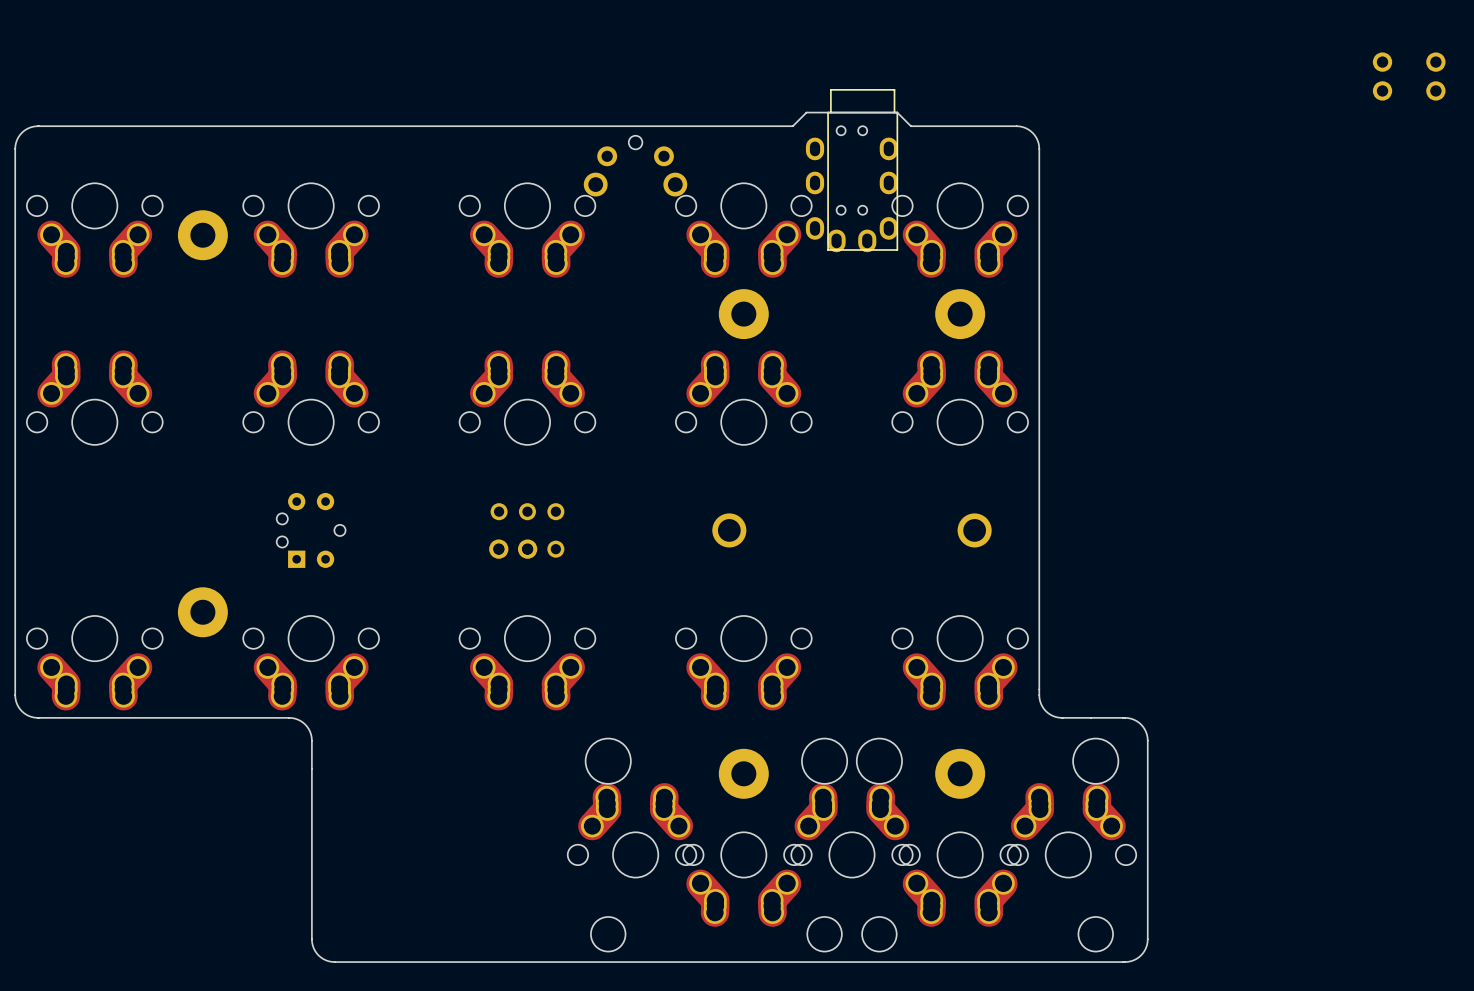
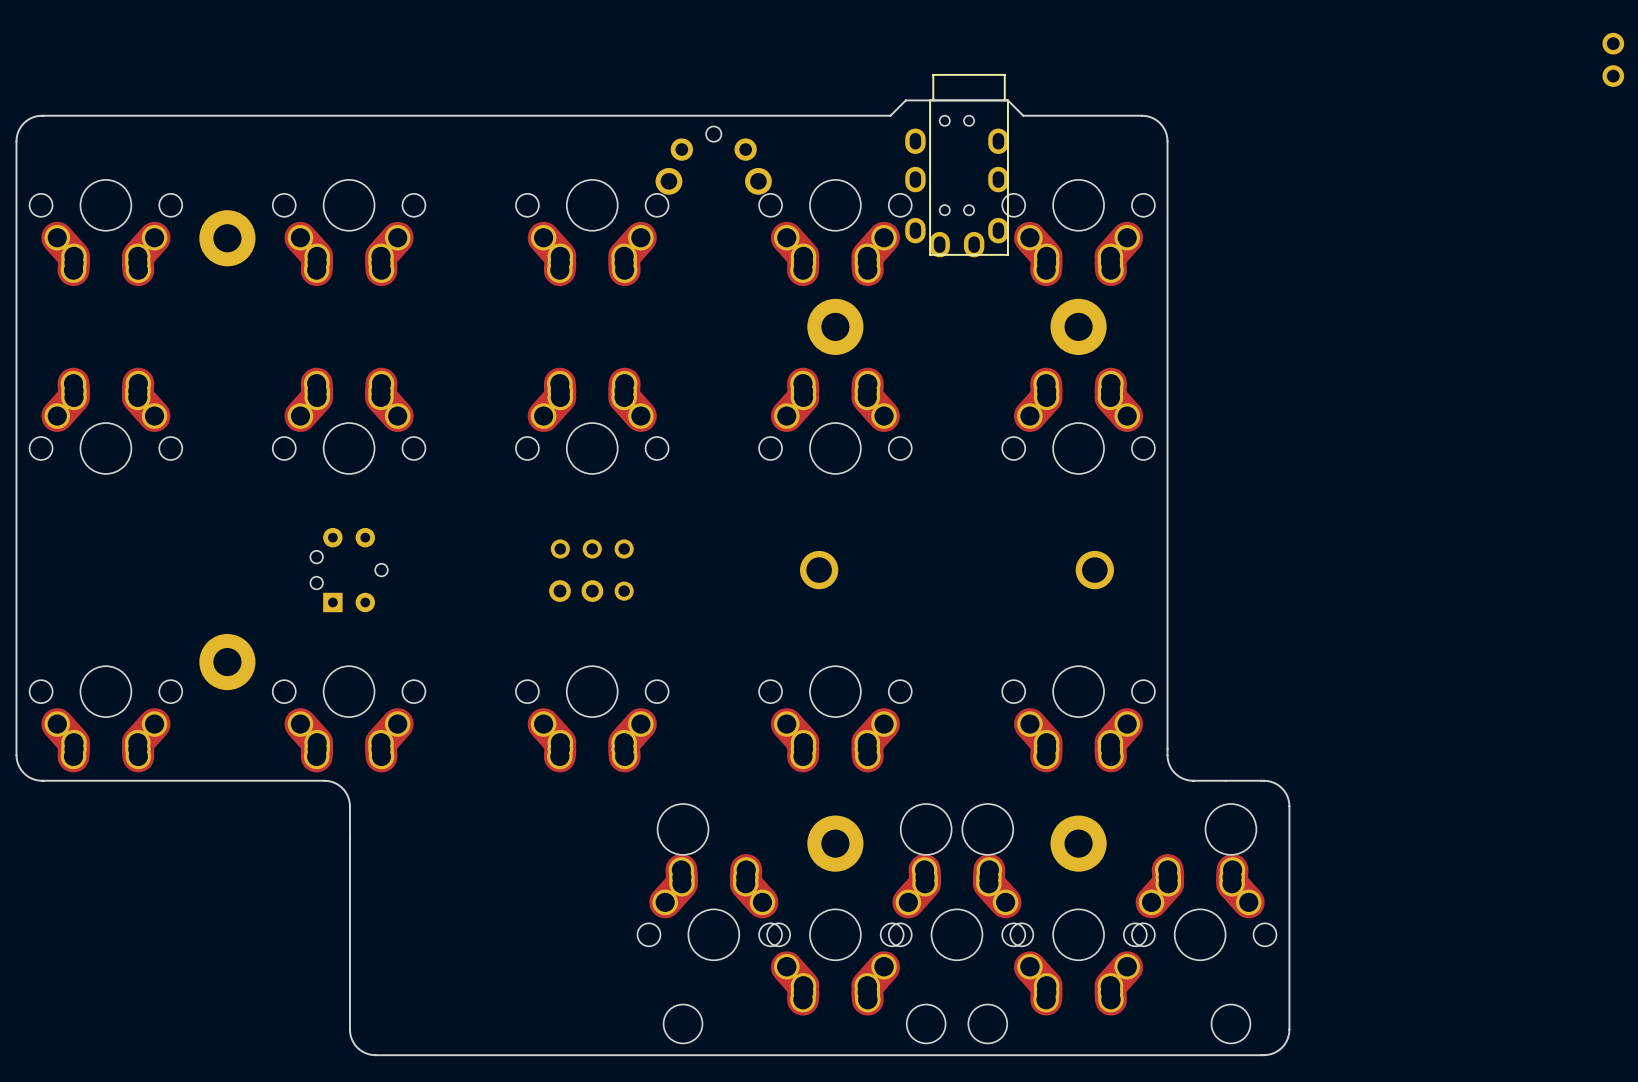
part: (1382, 76) -> none

